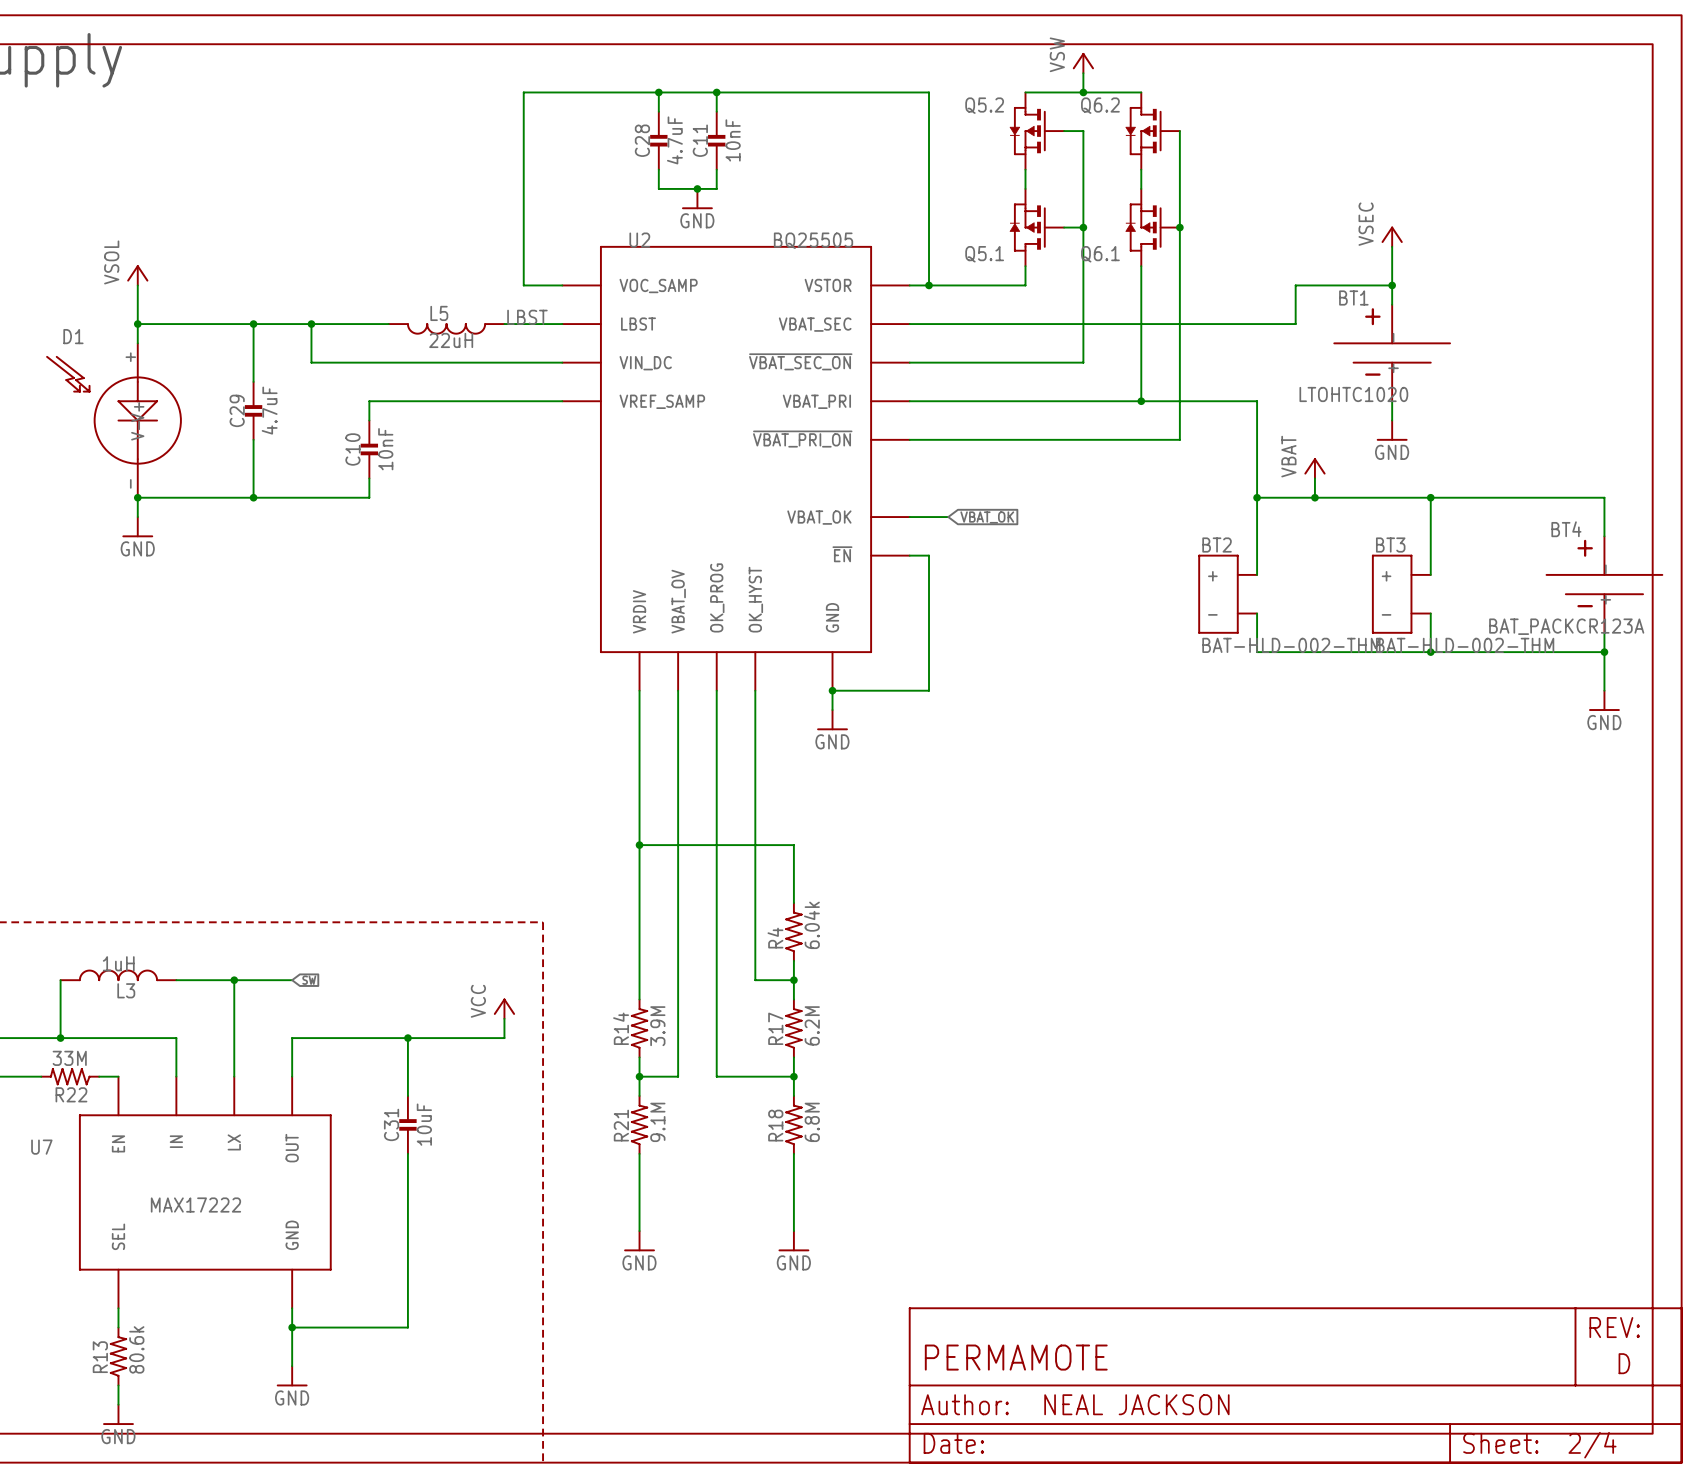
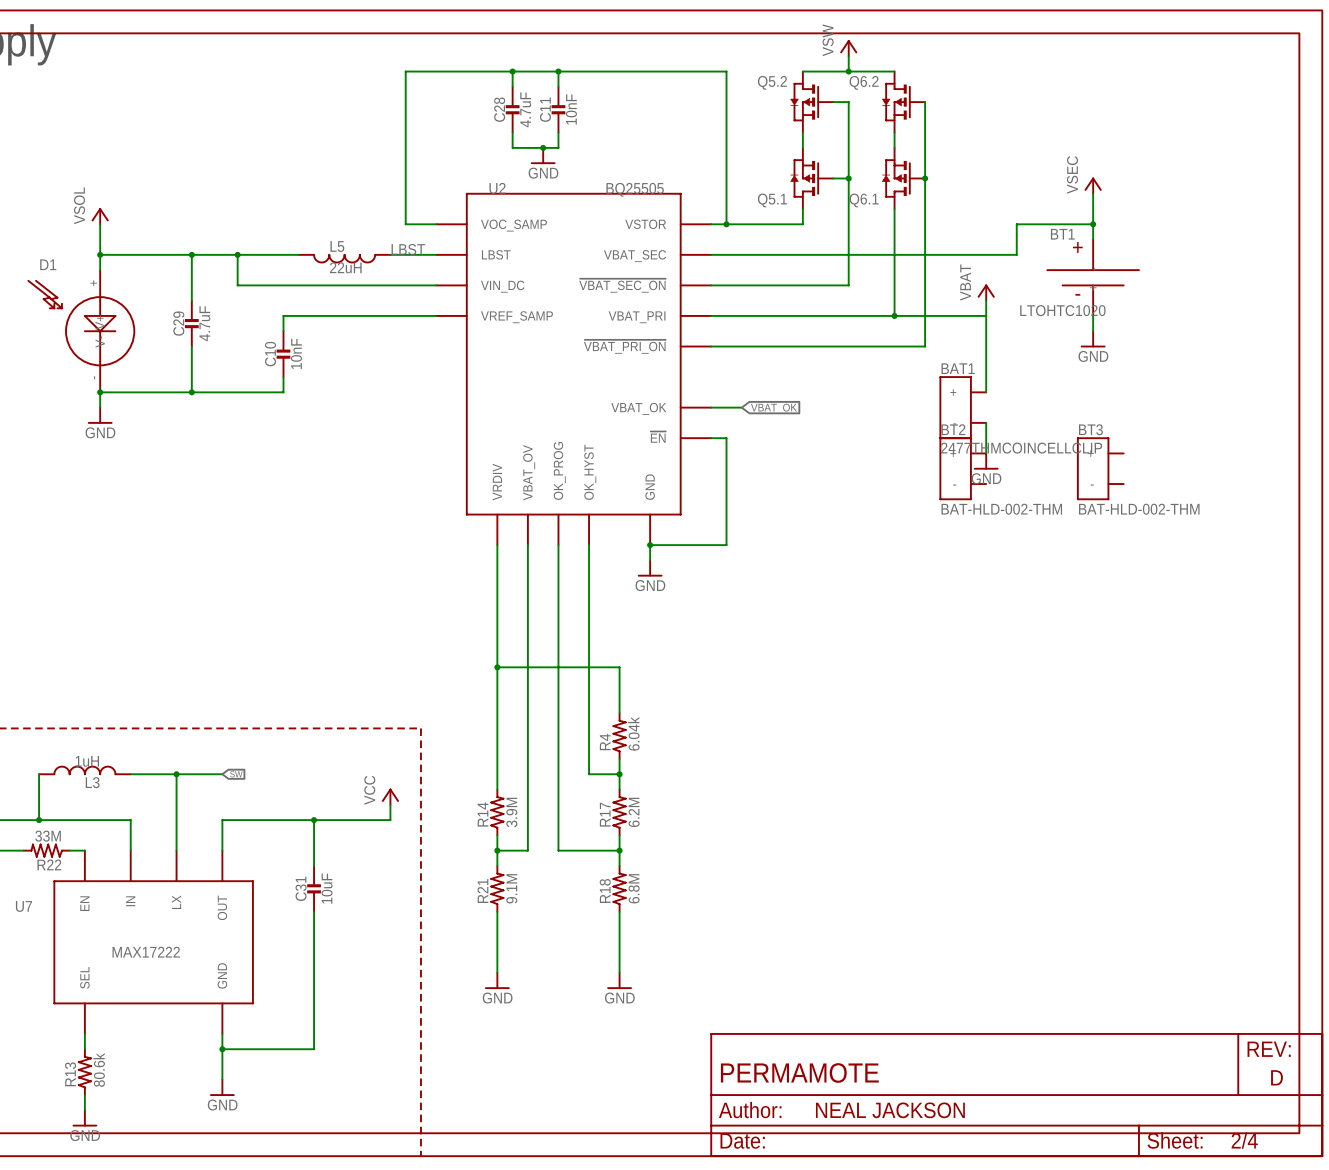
power symbol position: VBAT (1314, 468) -> VBAT (986, 292)
wire: (1314, 478) (1314, 497) -> (986, 300) (986, 315)
junction: (1257, 497) -> none
junction: (1314, 497) -> none
wire: (1430, 497) (1430, 574) -> none
junction: (1430, 497) -> none
BAT1: none -> 2477THMCOINCELLCLIP (962, 407)
wire: (1257, 536) (1257, 497) (1604, 497) (1604, 536) -> none
BT4: BAT_PACKCR123A (1604, 584) -> none
power symbol: none -> GND (986, 461)
wire: (1257, 613) (1257, 652) (1604, 652) -> none
wire: (1430, 613) (1430, 652) -> none
wire: (1604, 632) (1604, 690) -> none
junction: (1430, 652) -> none
junction: (1604, 652) -> none
power symbol: GND (1604, 700) -> none

